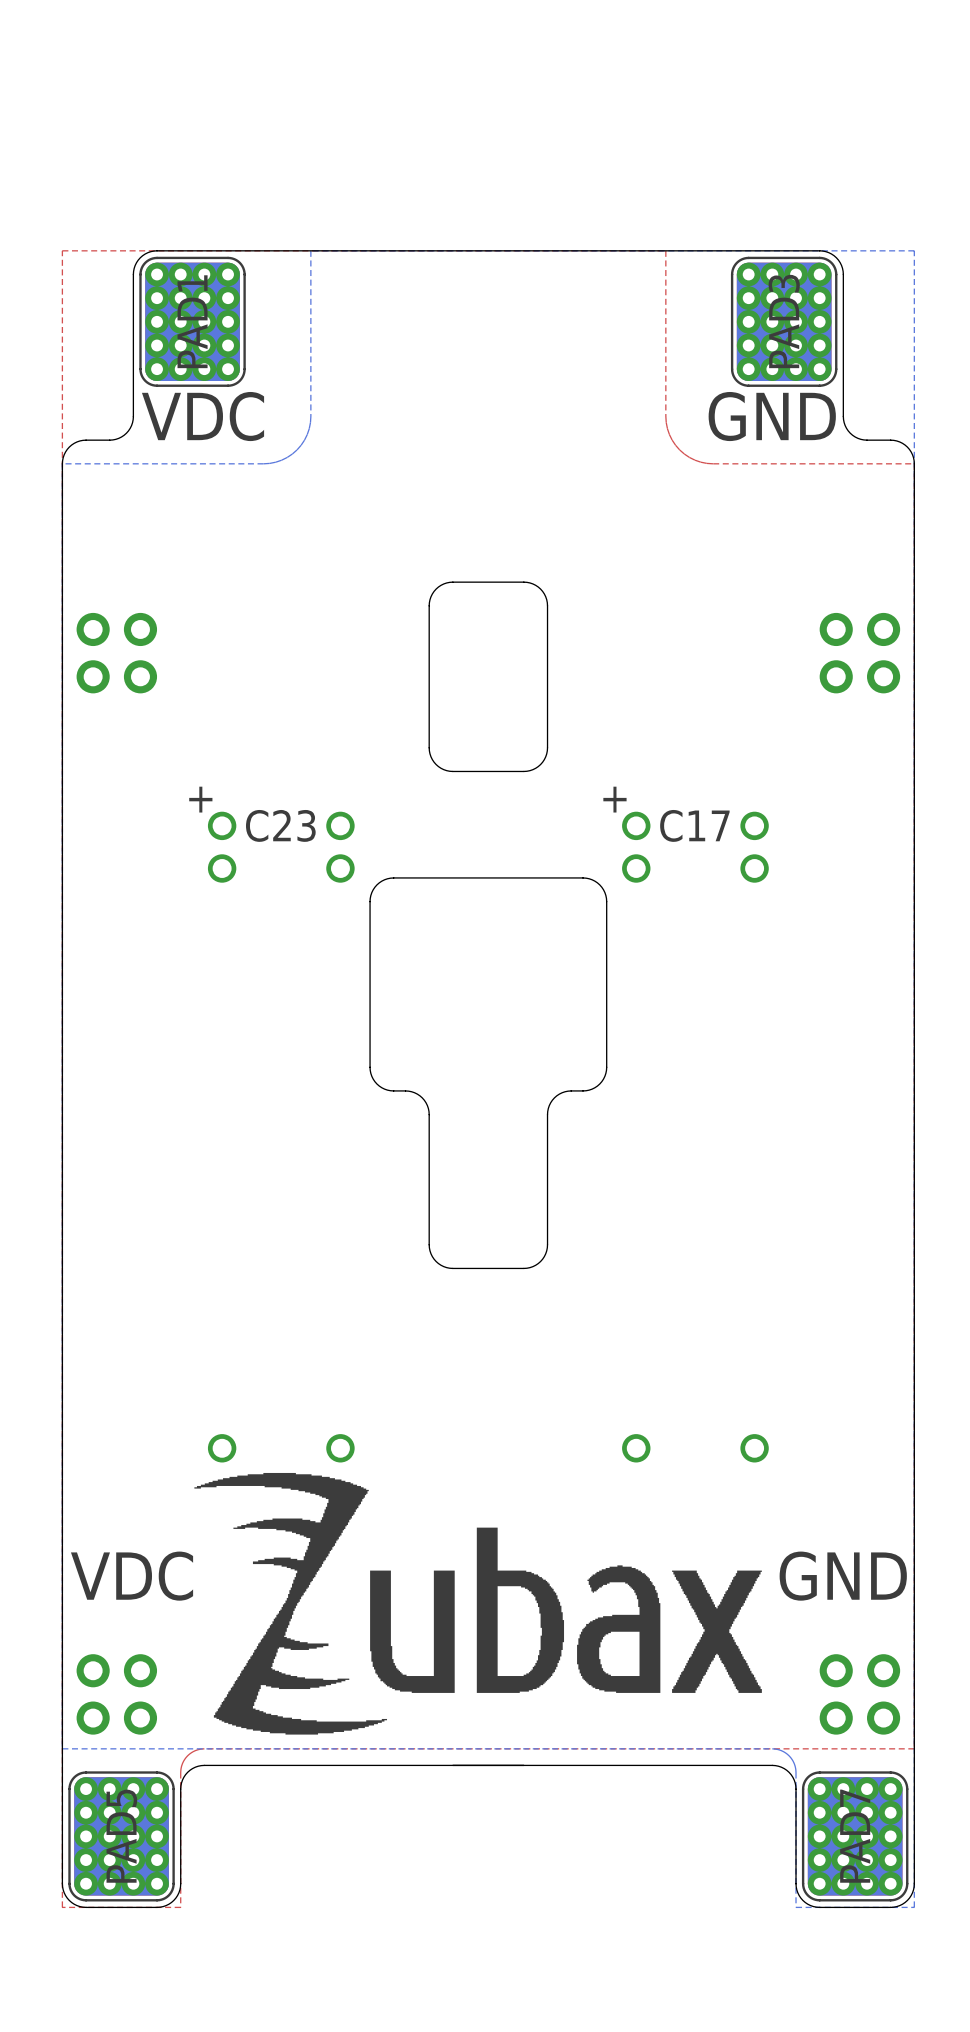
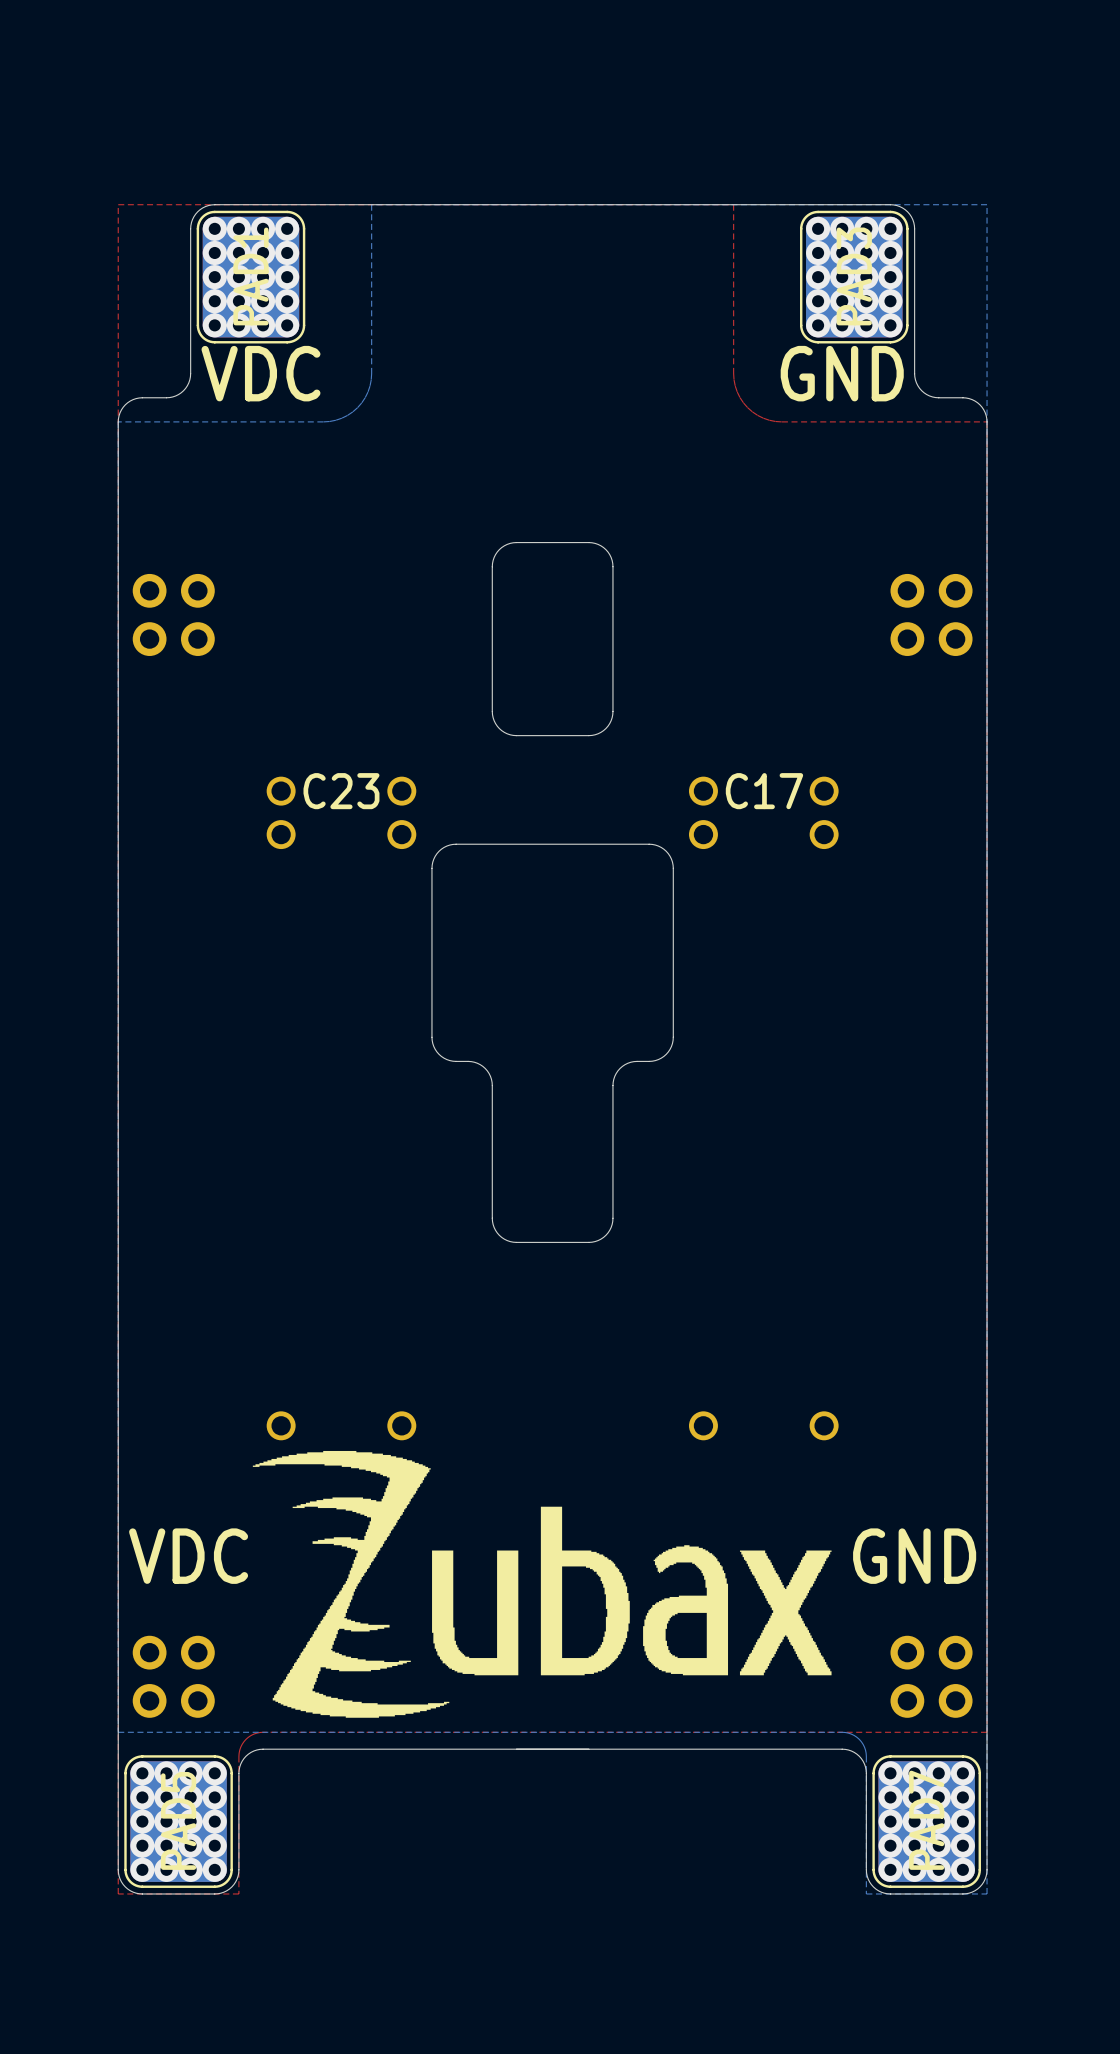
C23 text: + (200, 799) -> none
C17 text: + (614, 799) -> none

